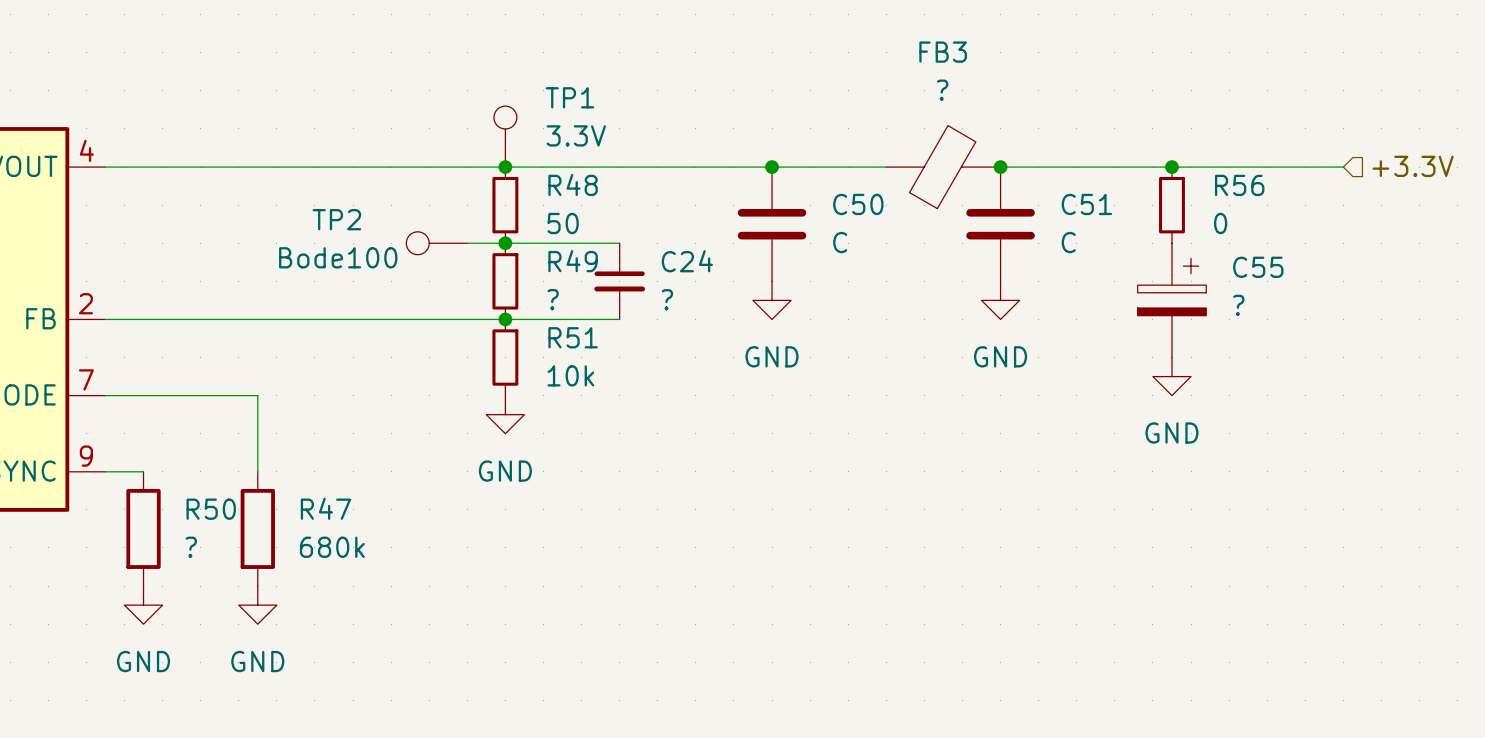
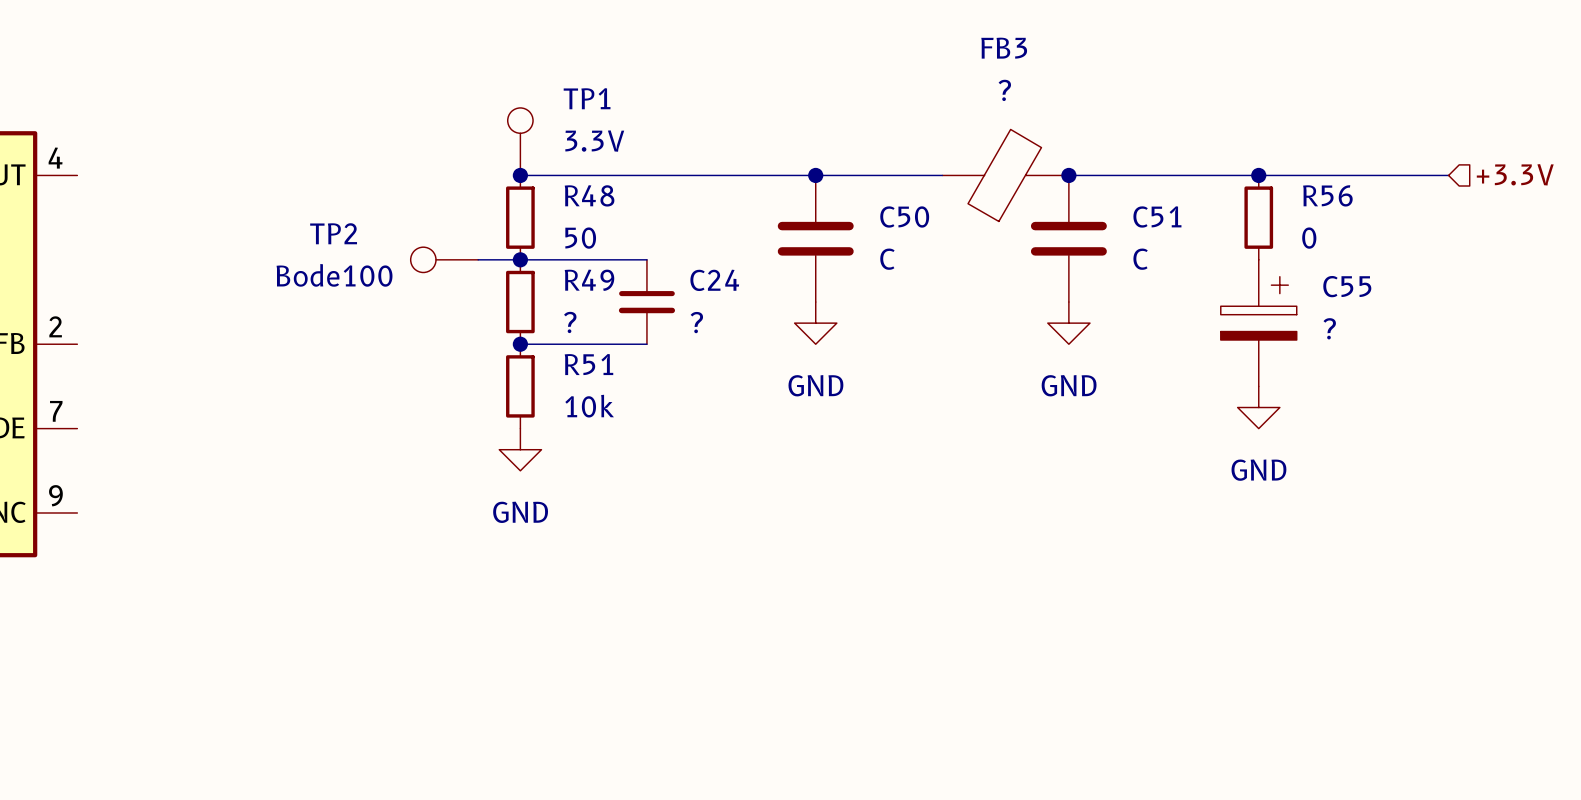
wire: (105, 167) (505, 167) -> none
wire: (105, 319) (505, 319) -> none
wire: (105, 395) (257, 395) (257, 471) -> none
wire: (105, 471) (143, 471) -> none
R50: ? (143, 528) -> none
R47: 680k (257, 528) -> none
power symbol: GND (143, 605) -> none
power symbol: GND (257, 605) -> none

